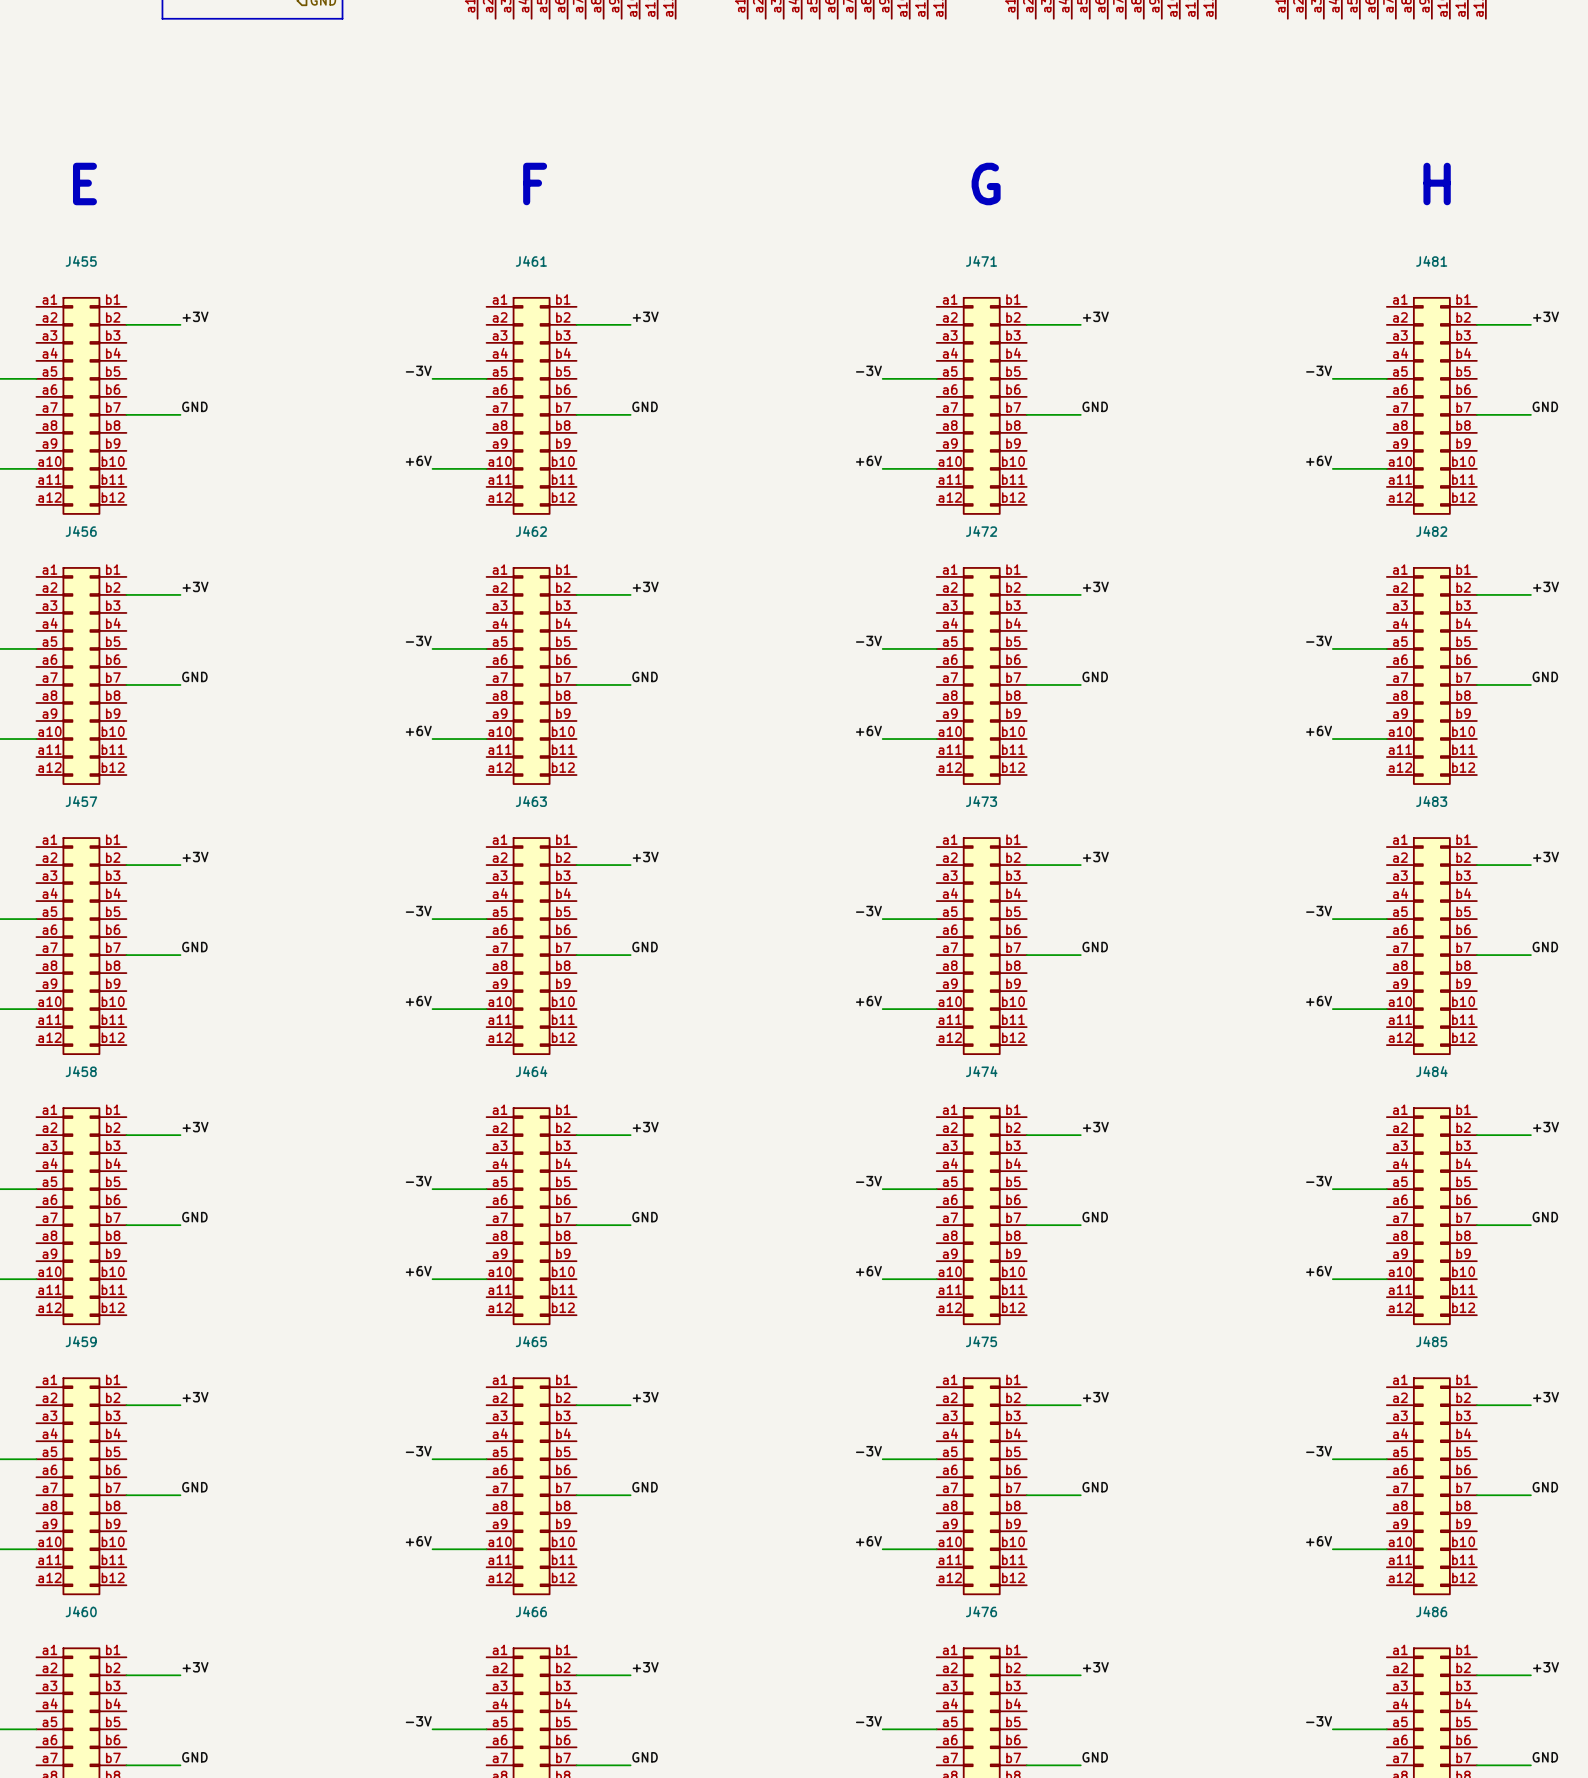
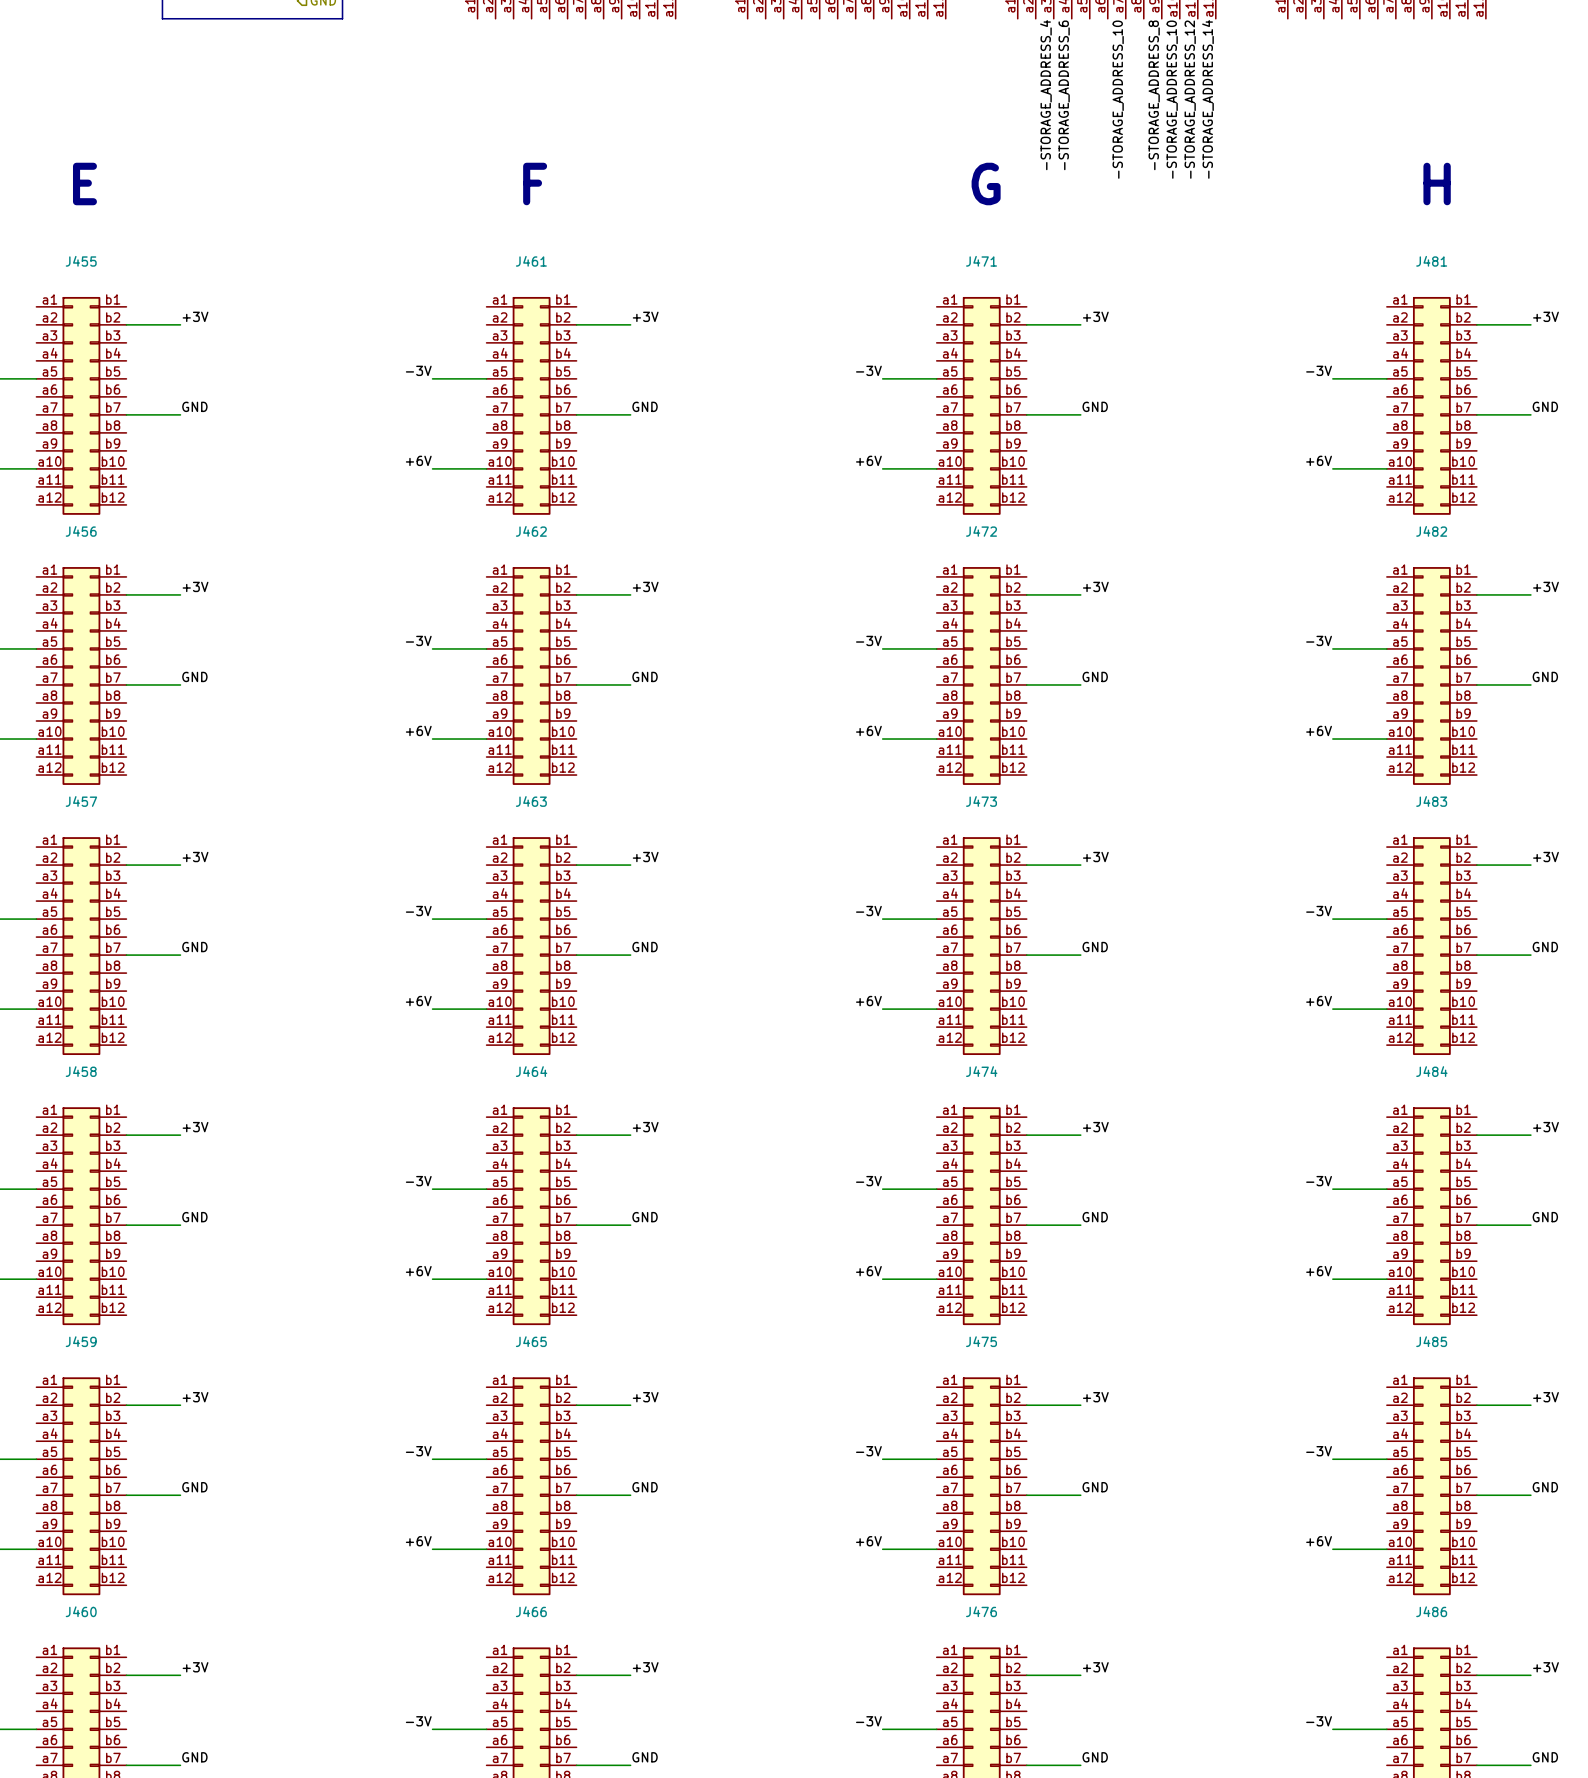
label: none -> -STORAGE_ADDRESS_4 (1045, 95)
label: none -> -STORAGE_ADDRESS_6 (1064, 95)
label: none -> -STORAGE_ADDRESS_8 (1154, 95)
label: none -> -STORAGE_ADDRESS_10 (1118, 99)
label: none -> -STORAGE_ADDRESS_10 (1172, 99)
label: none -> -STORAGE_ADDRESS_12 (1190, 99)
label: none -> -STORAGE_ADDRESS_14 (1207, 99)

